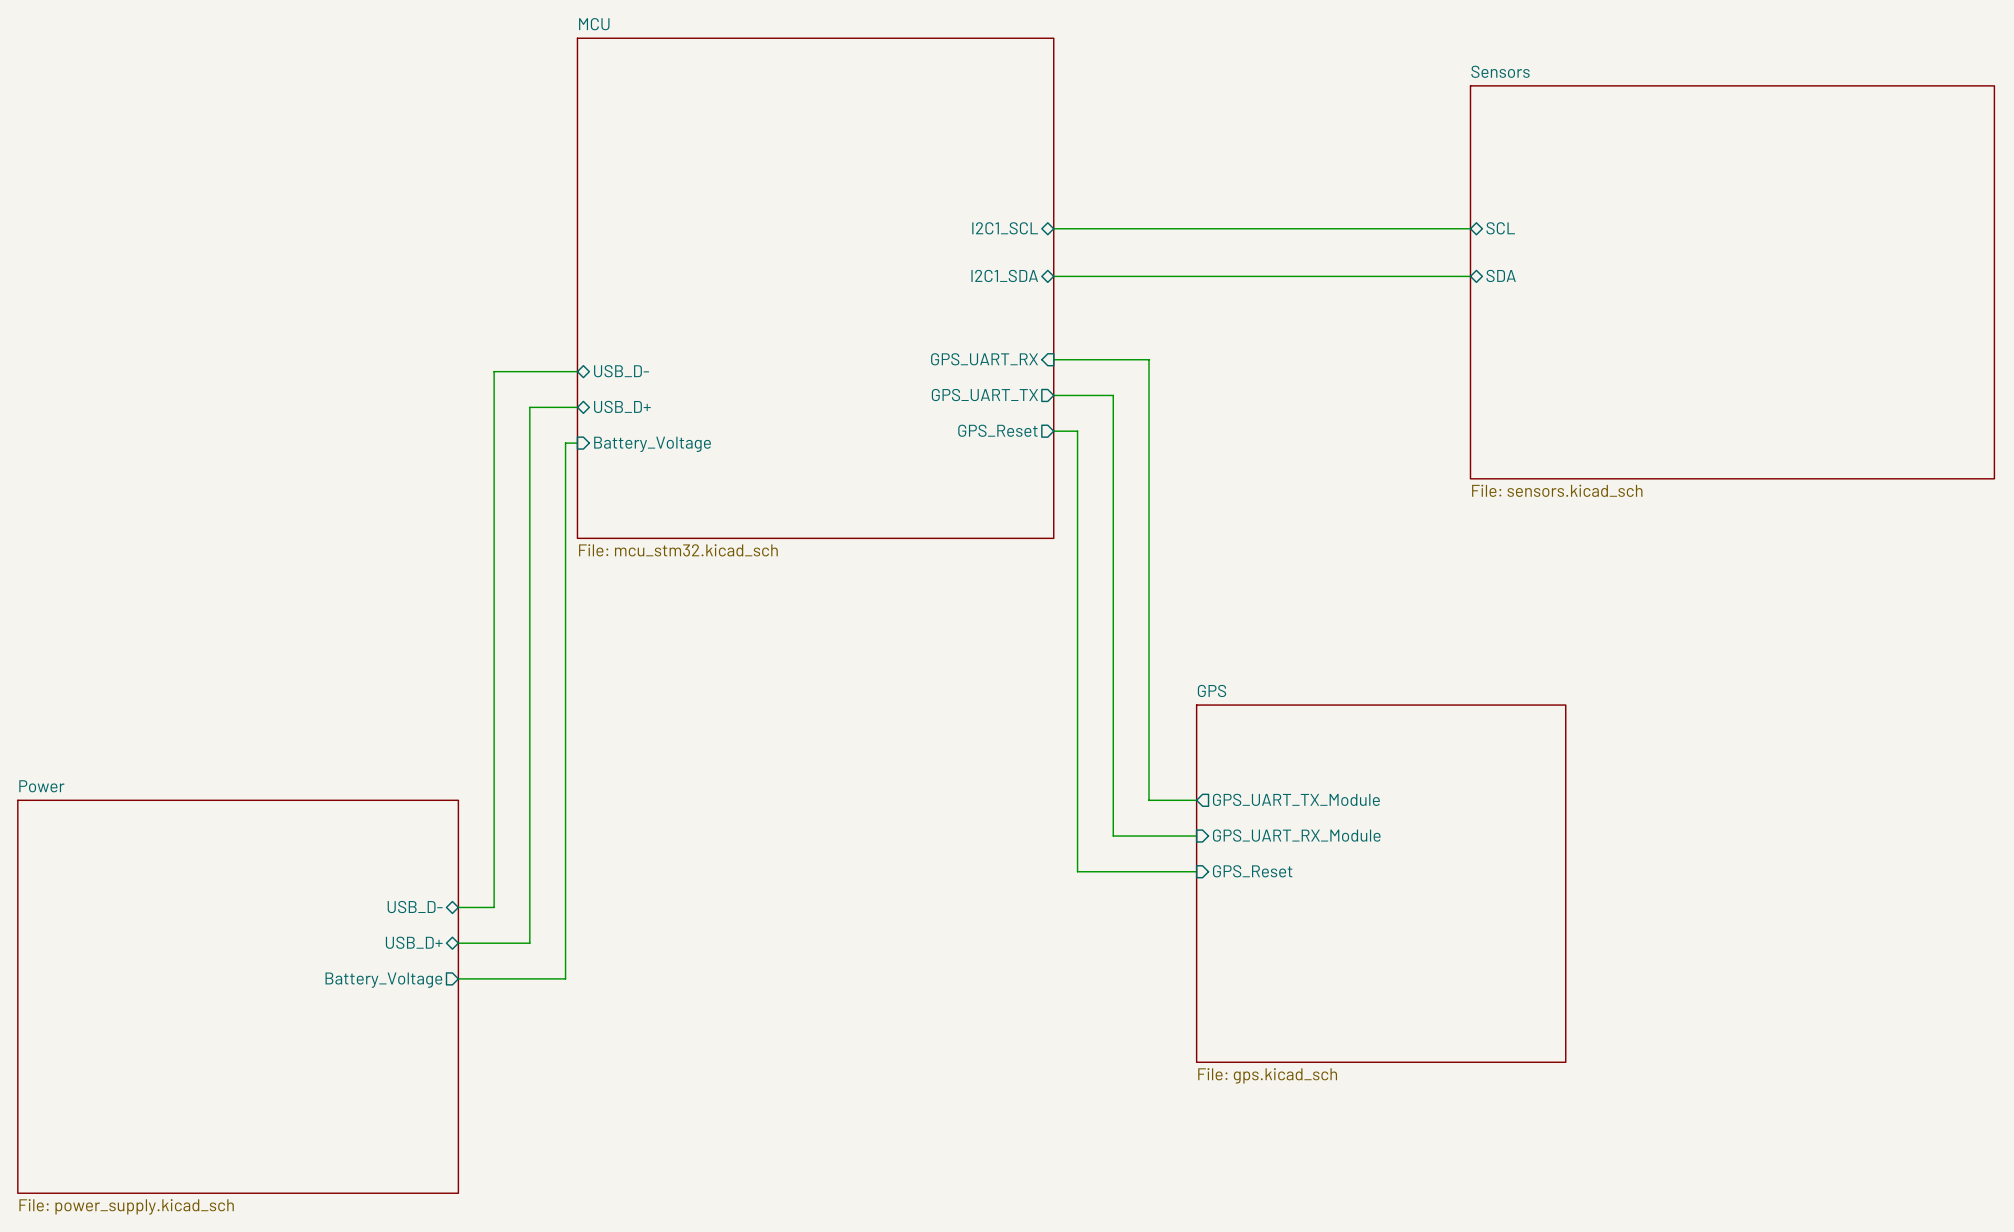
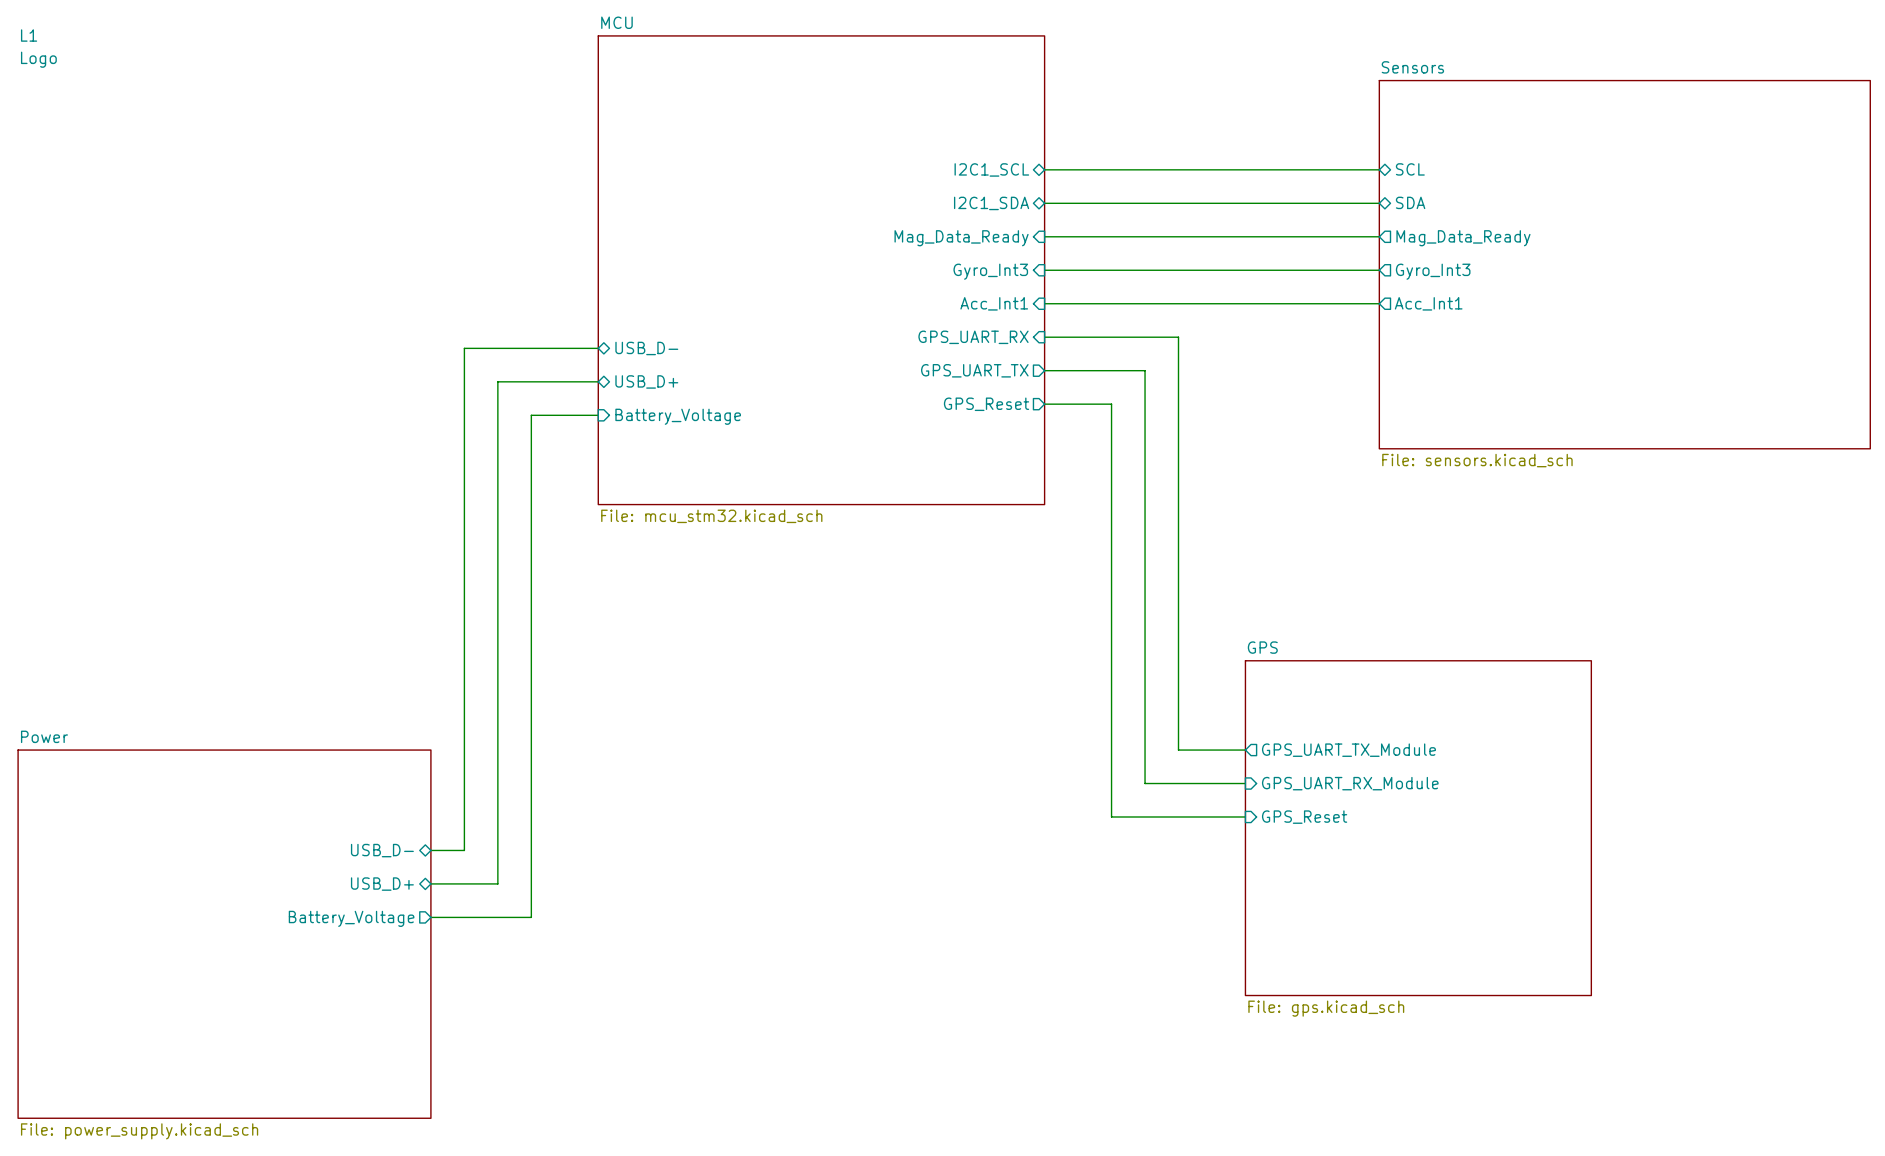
L1: none -> Logo (38, 48)
wire: none -> (1044, 169) (1379, 169)
wire: none -> (1044, 203) (1379, 203)
sheet pin position: I2C1_SCL (1005, 228) -> I2C1_SCL (991, 169)
wire: (1053, 228) (1470, 228) -> none
sheet pin position: SCL (1500, 228) -> SCL (1410, 169)
wire: none -> (1044, 236) (1379, 236)
sheet pin: none -> Mag_Data_Ready (961, 238)
sheet pin: none -> Mag_Data_Ready (1463, 238)
sheet pin position: I2C1_SDA (1004, 275) -> I2C1_SDA (991, 203)
sheet pin position: SDA (1501, 275) -> SDA (1410, 202)
wire: (1053, 276) (1470, 276) -> none
sheet MCU position: (815, 288) -> (821, 270)
wire: none -> (1044, 270) (1379, 270)
sheet pin: none -> Gyro_Int3 (990, 271)
sheet pin: none -> Gyro_Int3 (1433, 271)
sheet pin: none -> Acc_Int1 (994, 303)
sheet pin: none -> Acc_Int1 (1428, 303)
wire: none -> (1044, 303) (1379, 303)
sheet pin position: GPS_UART_RX (984, 359) -> GPS_UART_RX (973, 337)
wire: (1053, 359) (1113, 359) -> none
wire: (1149, 359) (1149, 800) (1196, 800) -> (1078, 337) (1178, 337) (1178, 750) (1245, 750)
wire: none -> (542, 348) (598, 348)
sheet pin position: USB_D- (621, 371) -> USB_D- (646, 348)
sheet pin position: GPS_UART_TX (984, 395) -> GPS_UART_TX (974, 370)
wire: (1053, 395) (1113, 395) (1113, 836) (1196, 836) -> none
wire: none -> (1044, 370) (1145, 370) (1145, 783) (1245, 783)
sheet pin position: USB_D+ (622, 406) -> USB_D+ (646, 381)
wire: none -> (542, 381) (598, 381)
sheet pin position: GPS_Reset (997, 430) -> GPS_Reset (986, 404)
wire: (1053, 431) (1077, 431) (1077, 871) (1184, 871) -> (1044, 404) (1111, 404) (1111, 816)
wire: none -> (542, 415) (598, 415)
sheet pin position: Battery_Voltage (652, 444) -> Battery_Voltage (678, 416)
sheet pin position: GPS_UART_TX_Module (1296, 799) -> GPS_UART_TX_Module (1348, 750)
sheet pin position: GPS_UART_RX_Module (1296, 835) -> GPS_UART_RX_Module (1350, 783)
wire: none -> (1122, 816) (1245, 816)
sheet pin position: GPS_Reset (1252, 871) -> GPS_Reset (1304, 817)
sheet GPS position: (1381, 883) -> (1418, 828)

